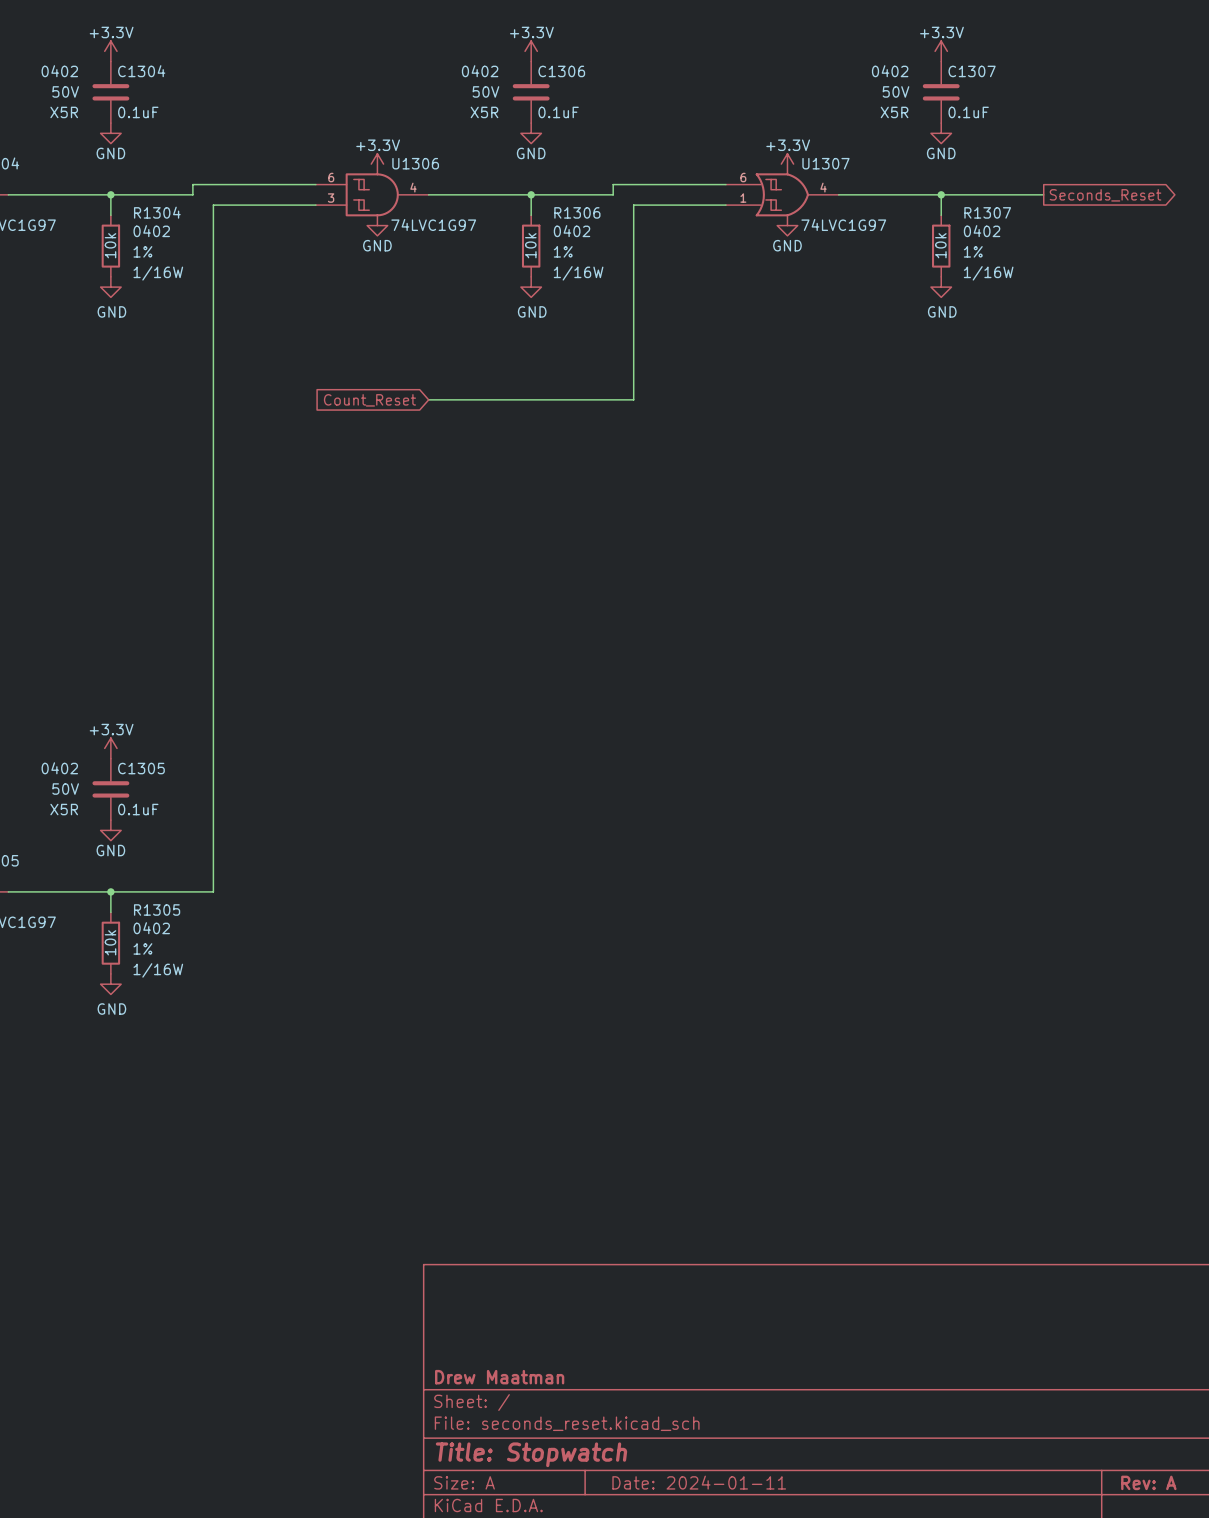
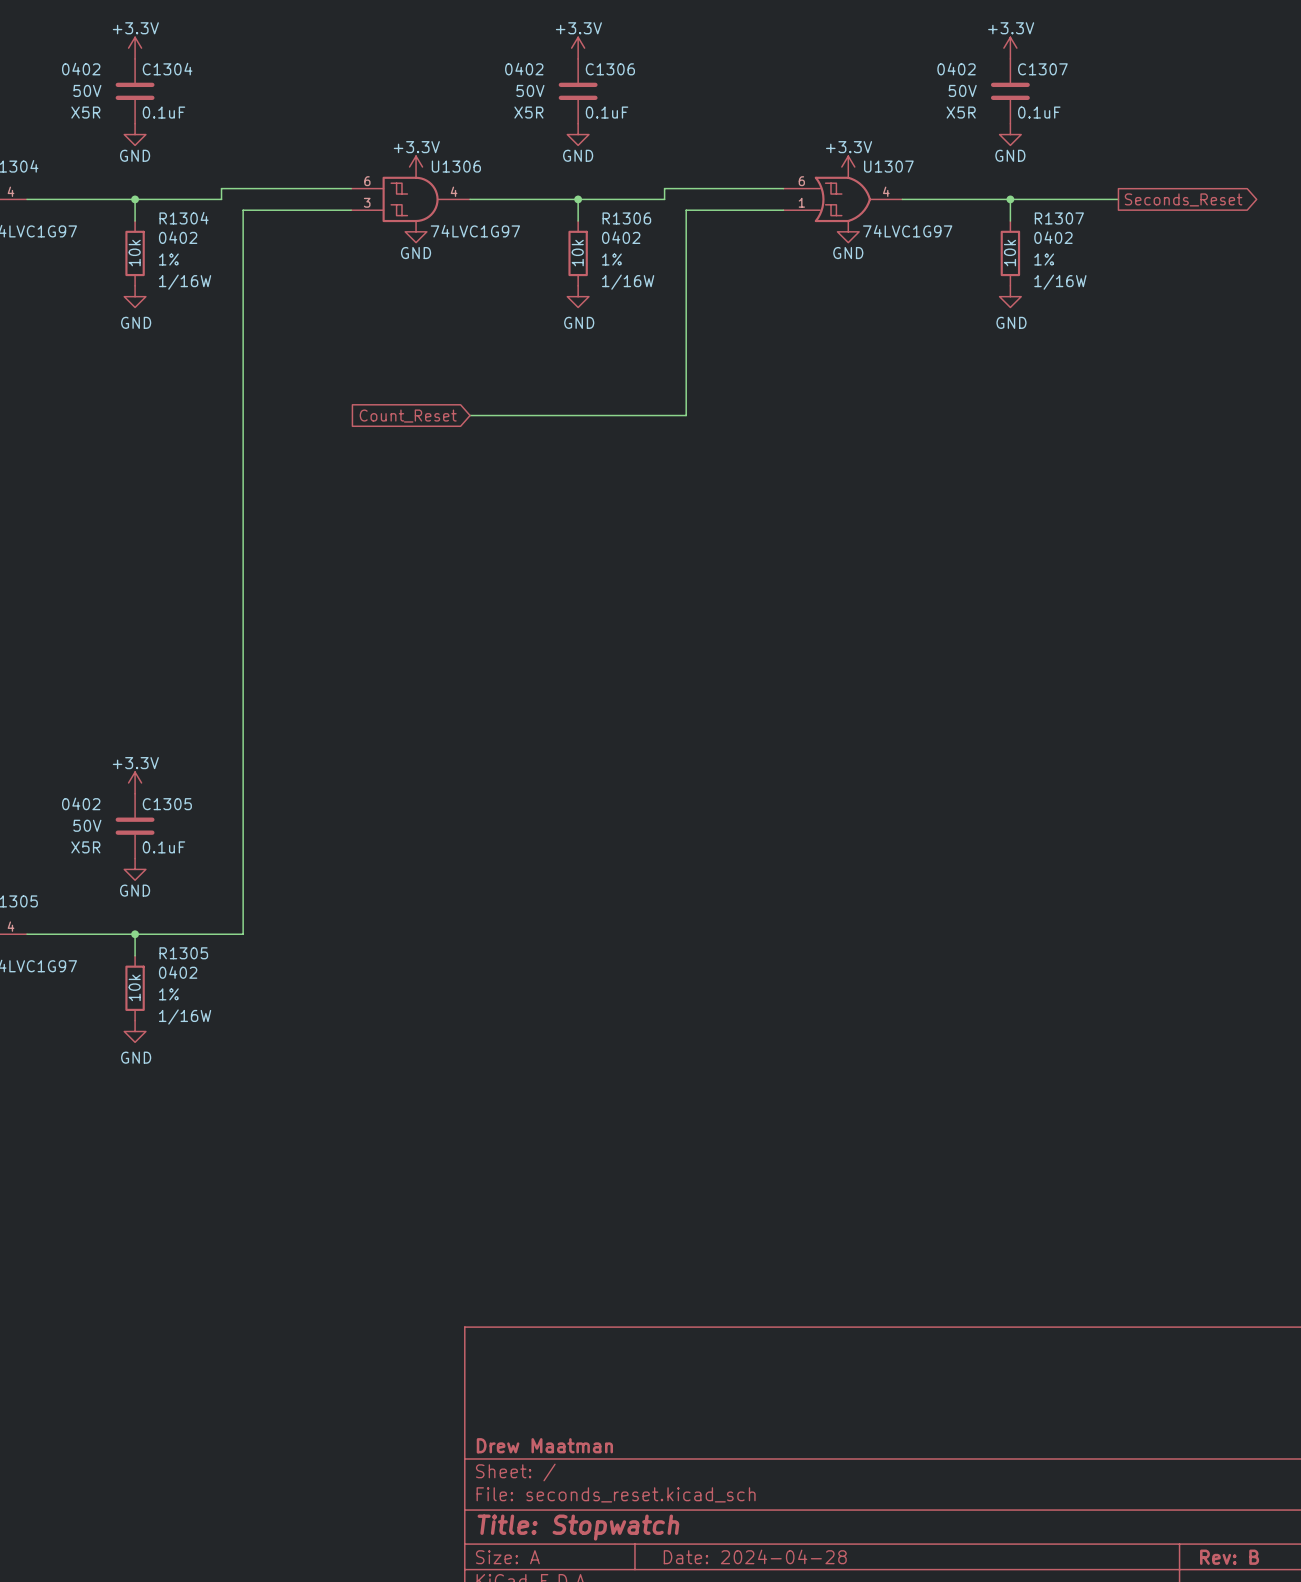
title block: Date: 2024-01-11 (699, 1482) -> Date: 2024-04-28 (755, 1556)
title block: Rev: A (1148, 1482) -> Rev: B (1229, 1557)

